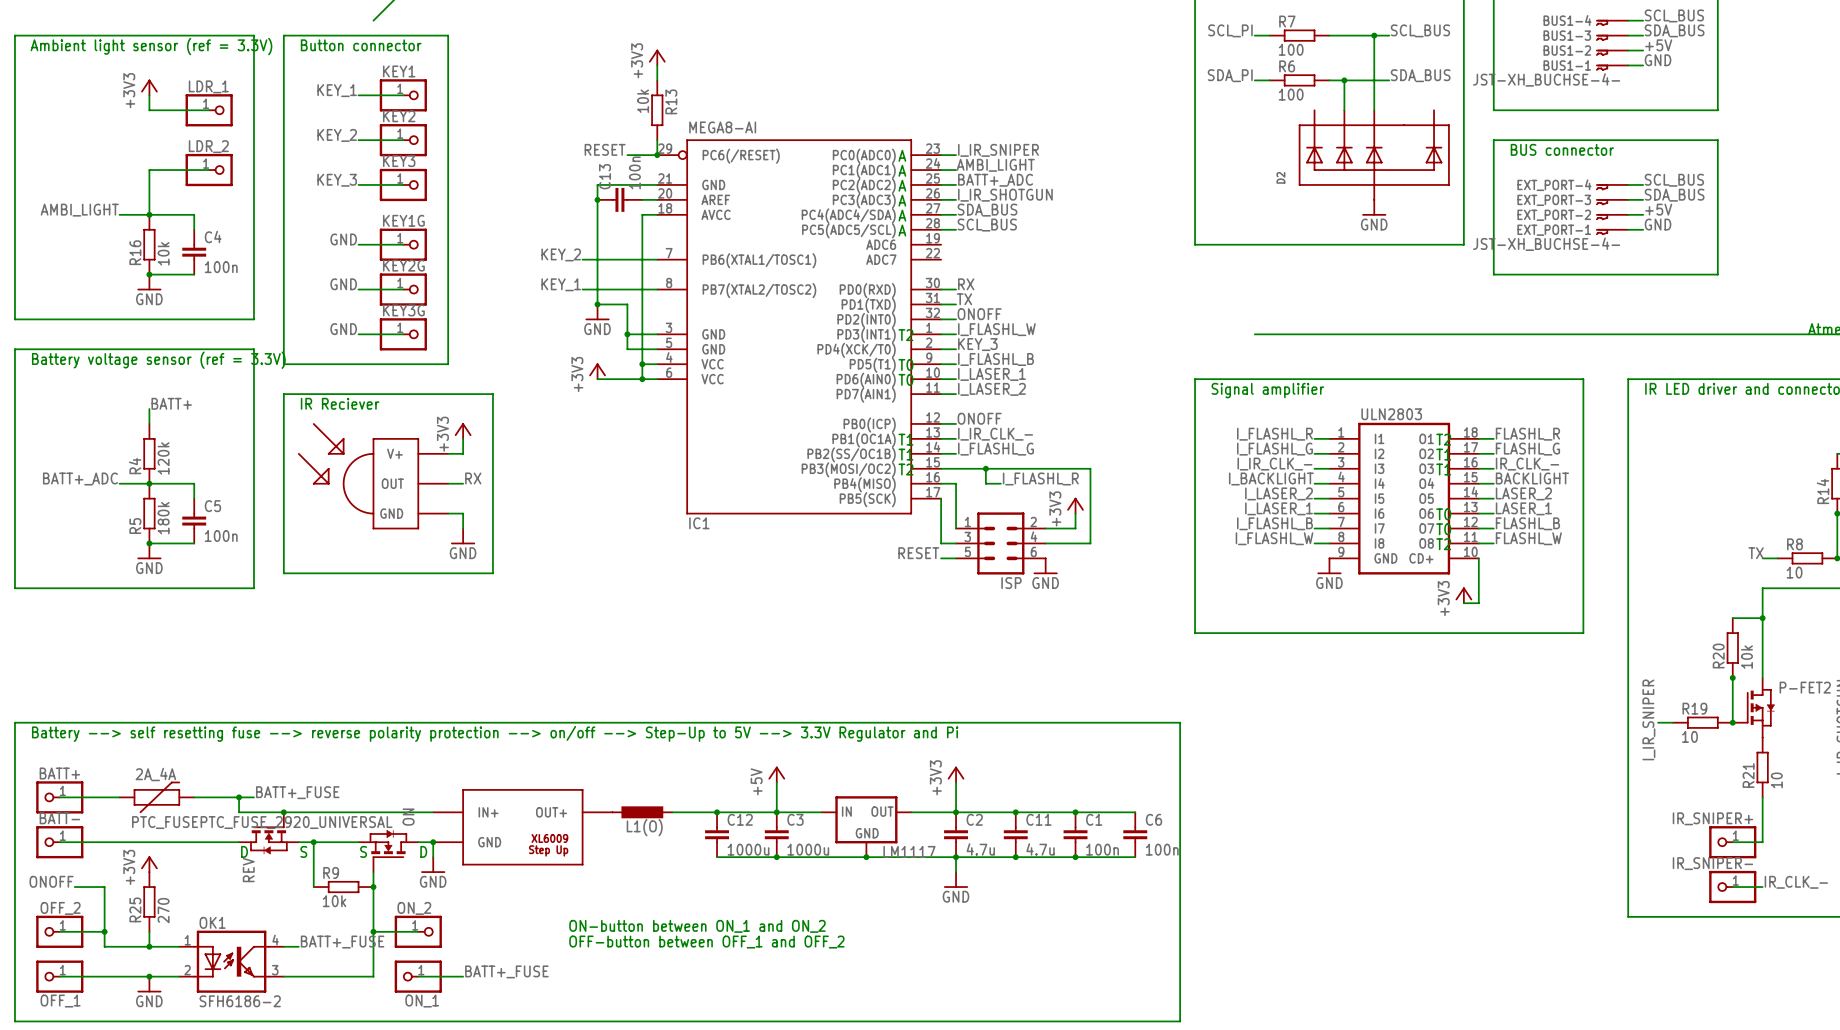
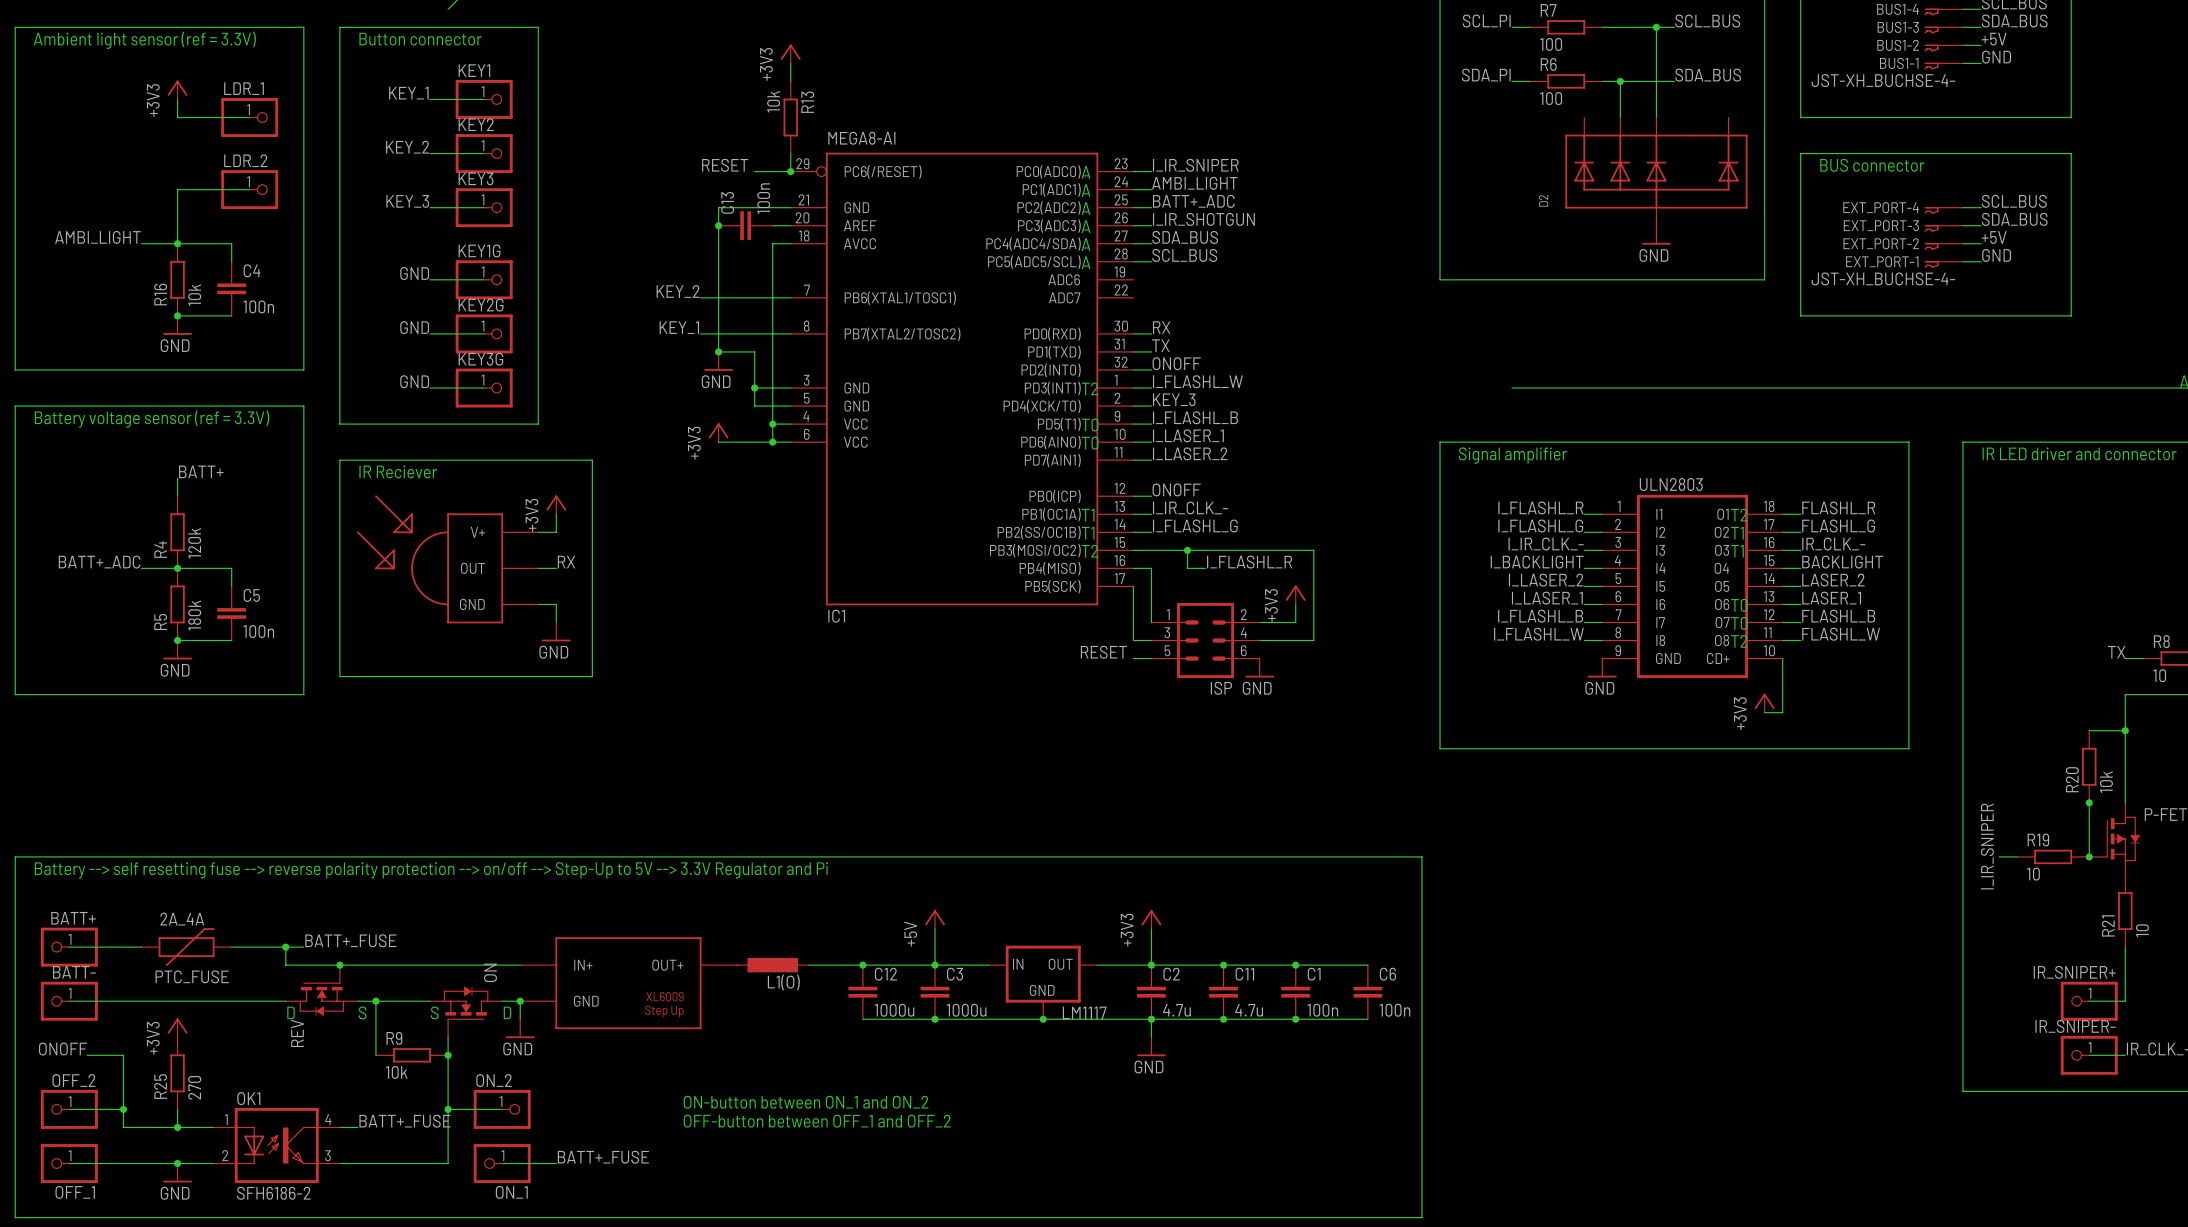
2A_4A value: PTC_FUSEPTC_FUSE_2920_UNIVERSAL (262, 822) -> PTC_FUSE (192, 976)

